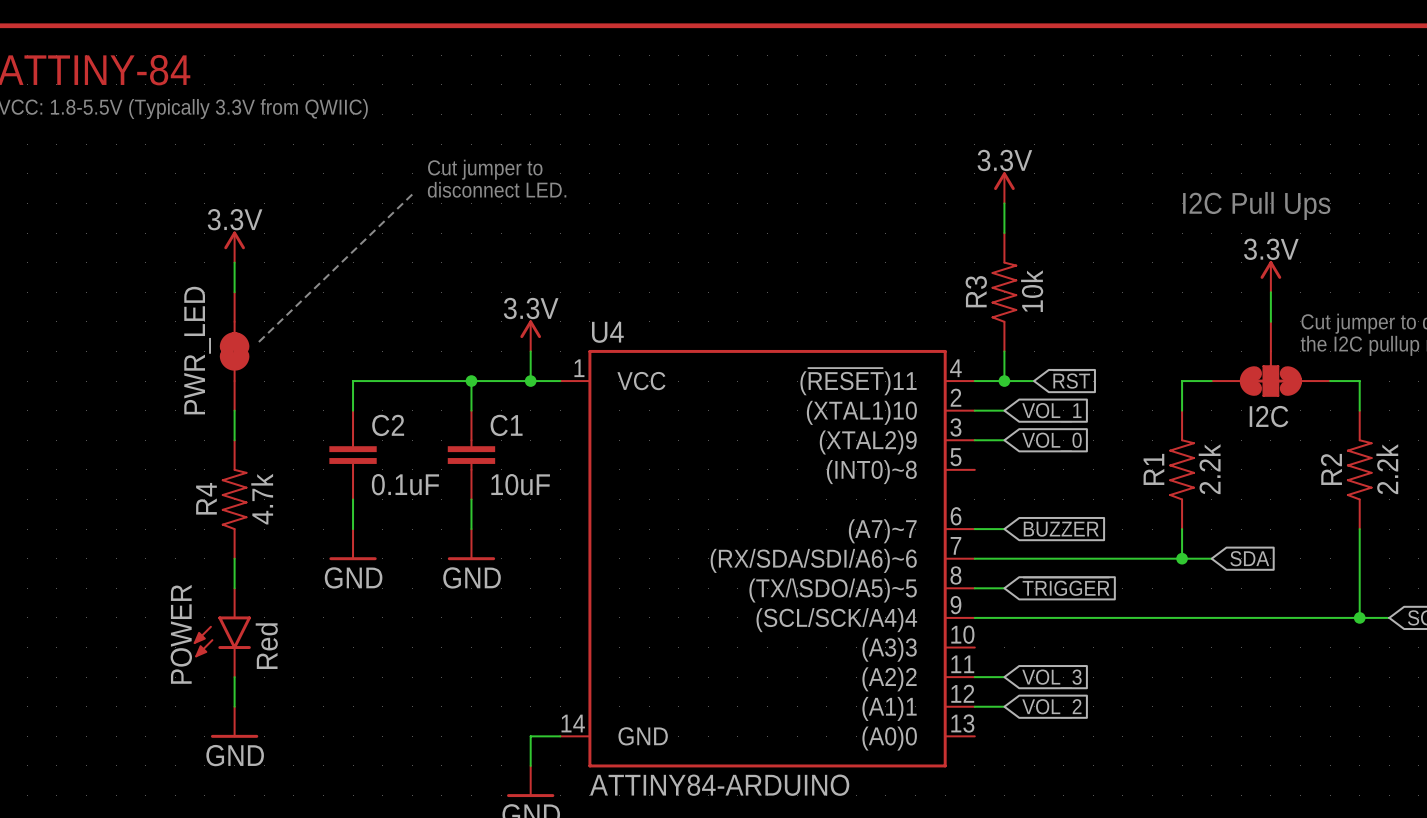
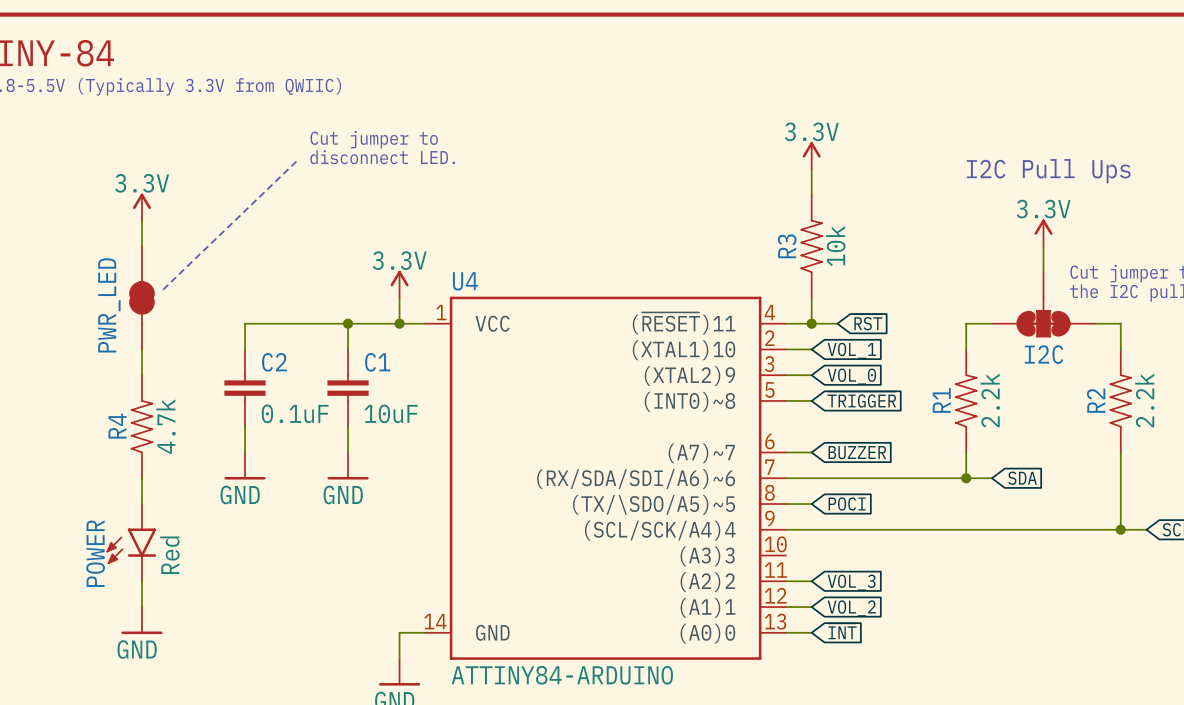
global label: none -> ~{TRIGGER} (861, 399)
wire: none -> (785, 400) (811, 400)
global label: ~{TRIGGER} (1066, 586) -> POCI (847, 504)
global label: none -> ~{INT} (842, 631)
wire: none -> (785, 632) (811, 632)

